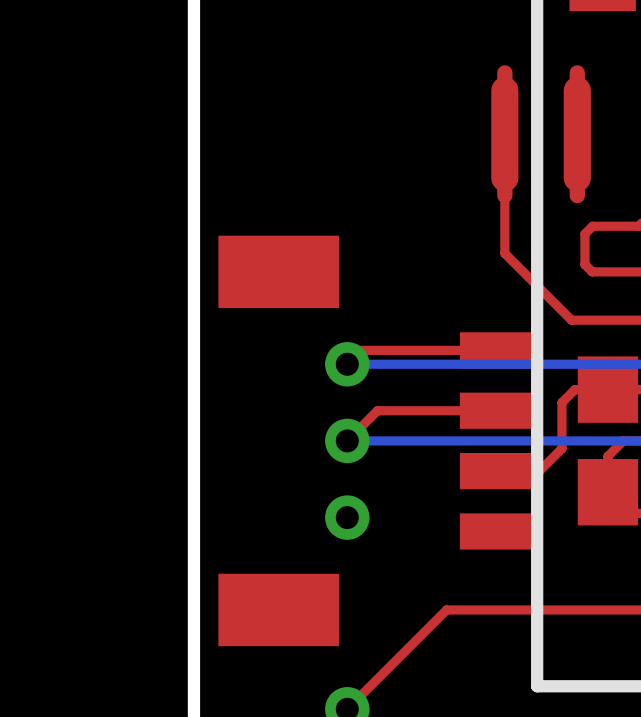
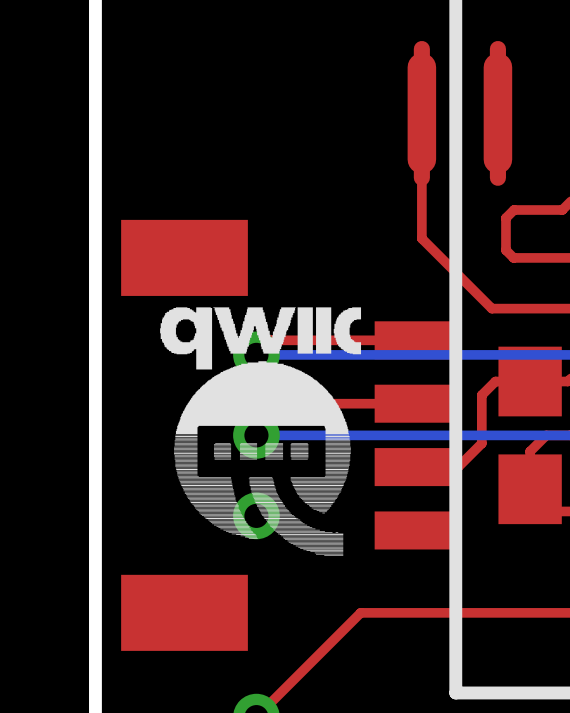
drawing: none -> [160, 307, 362, 556]

